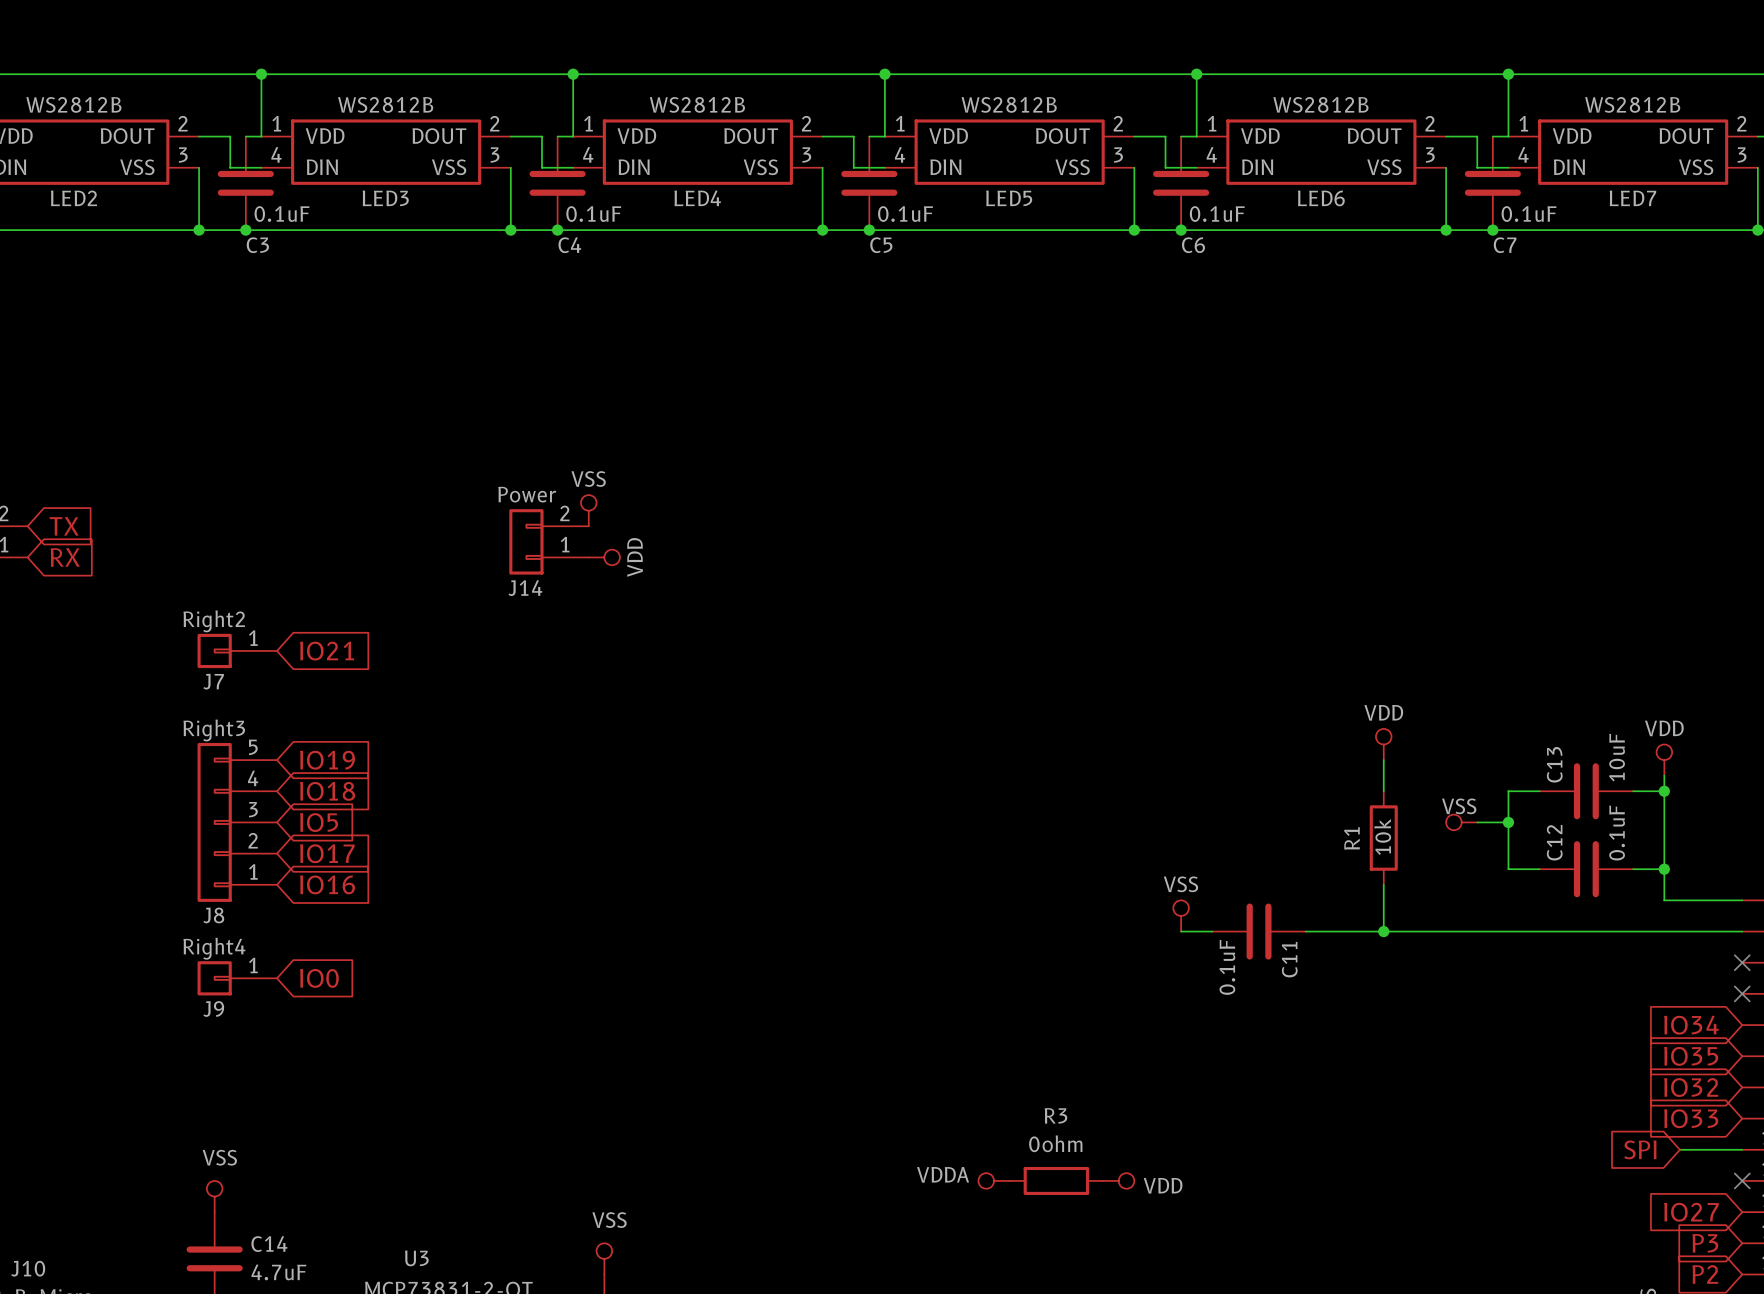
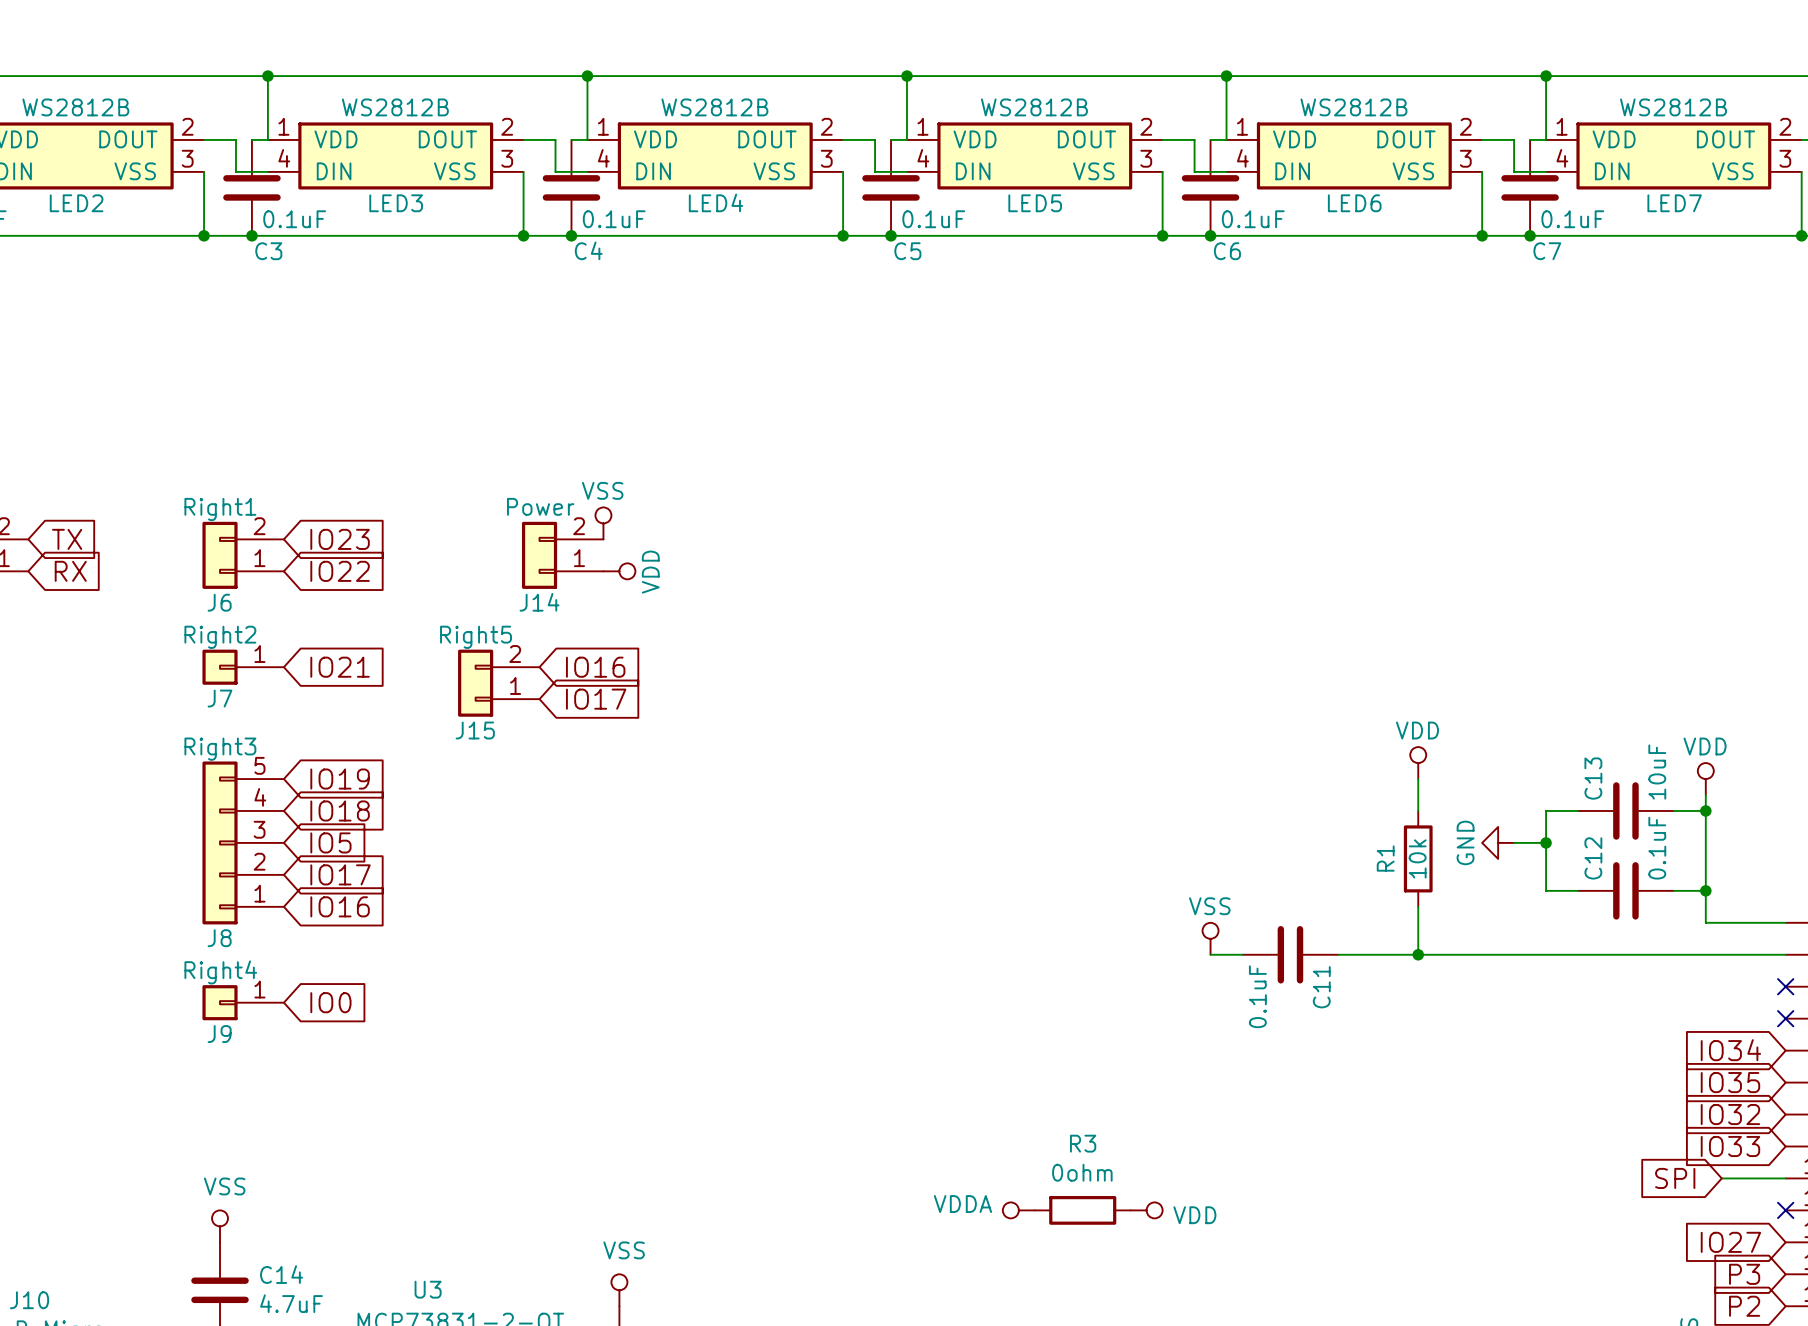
global label: none -> IO23 (340, 539)
J6: none -> Right1 (243, 555)
global label: none -> IO22 (340, 571)
global label: none -> IO16 (595, 667)
J15: none -> Right5 (498, 683)
global label: none -> IO17 (596, 699)
power symbol: VSS (1461, 822) -> GND (1498, 842)

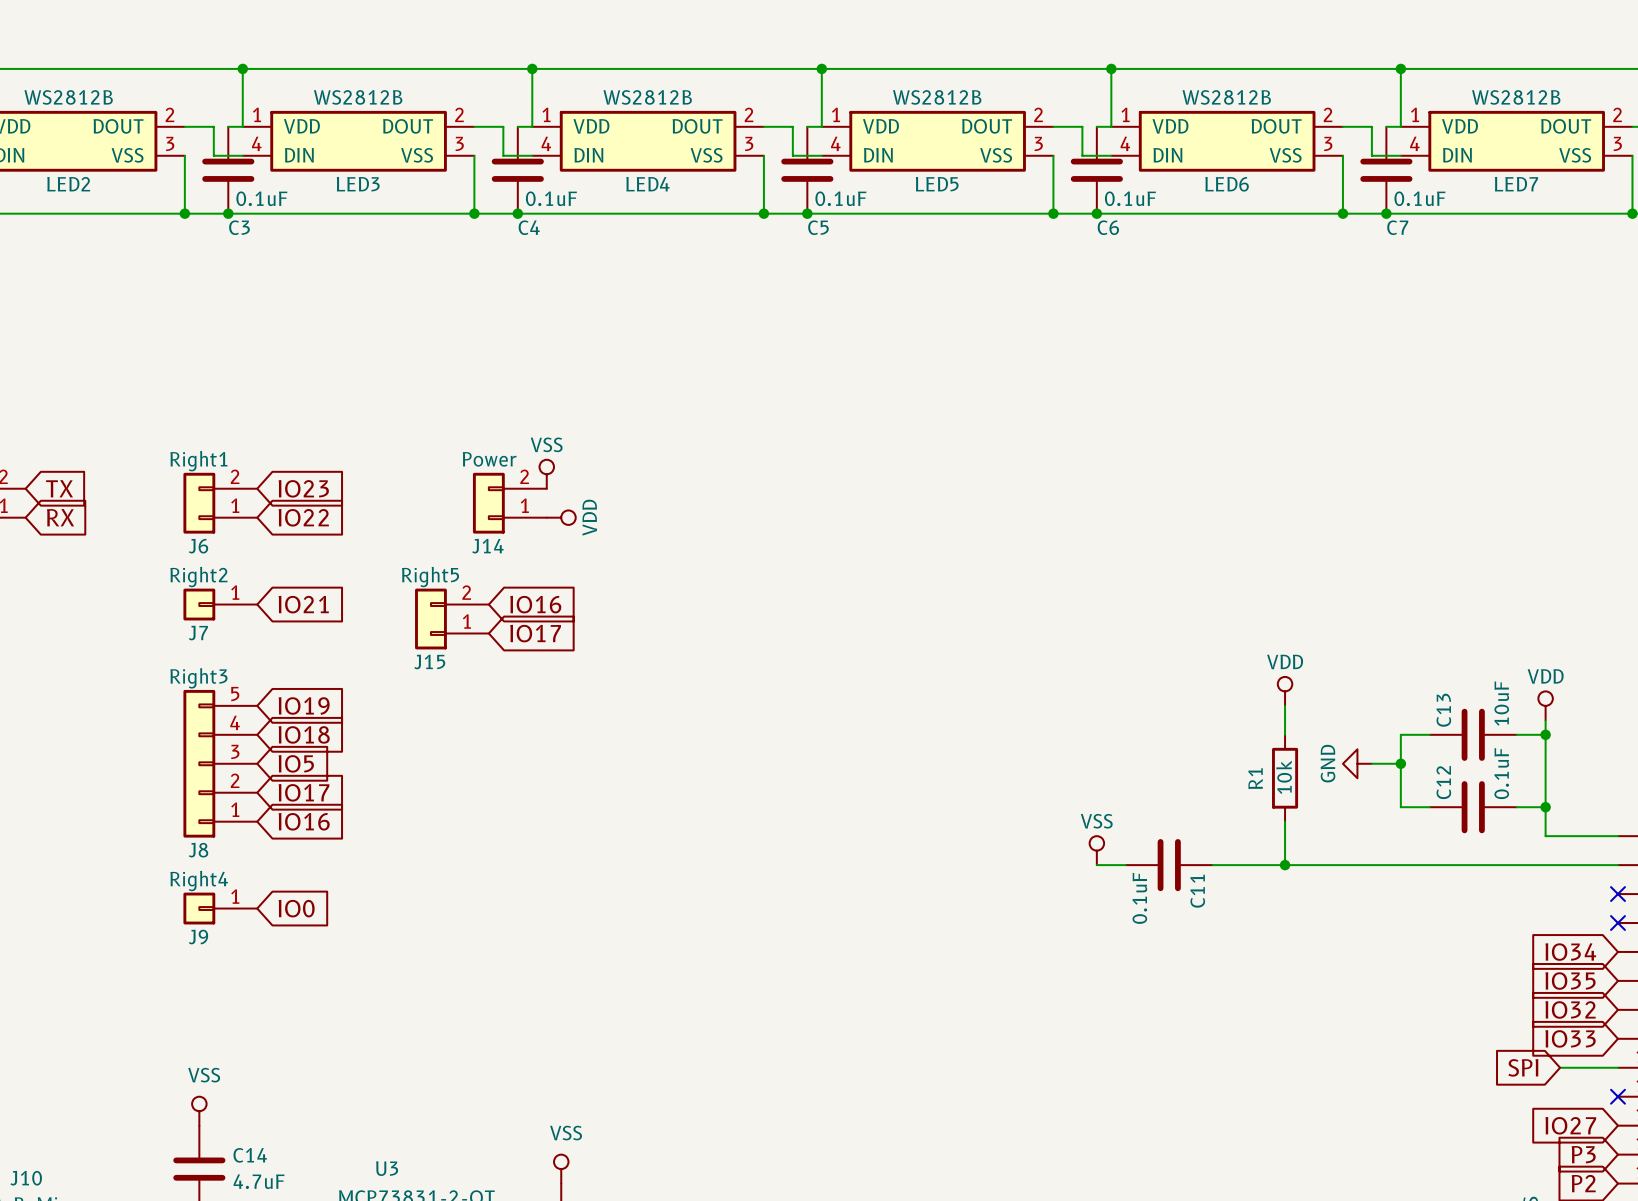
power symbol: VDDA (1018, 1210) -> none
R3: 0ohm (1082, 1210) -> none
power symbol: VDD (1146, 1210) -> none

